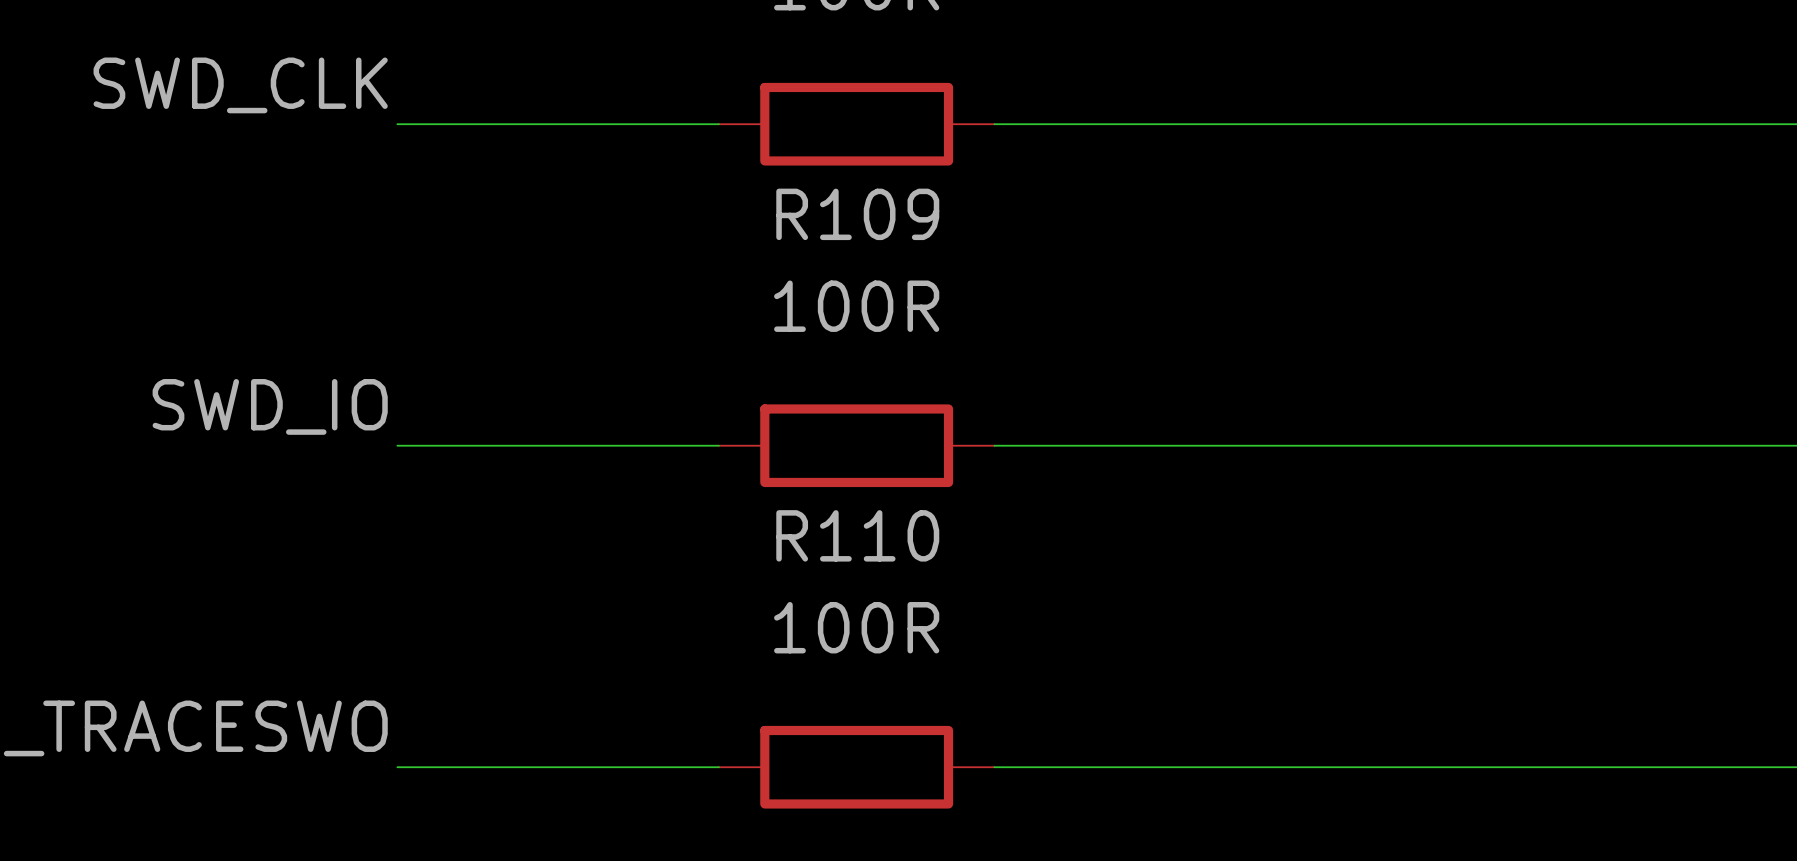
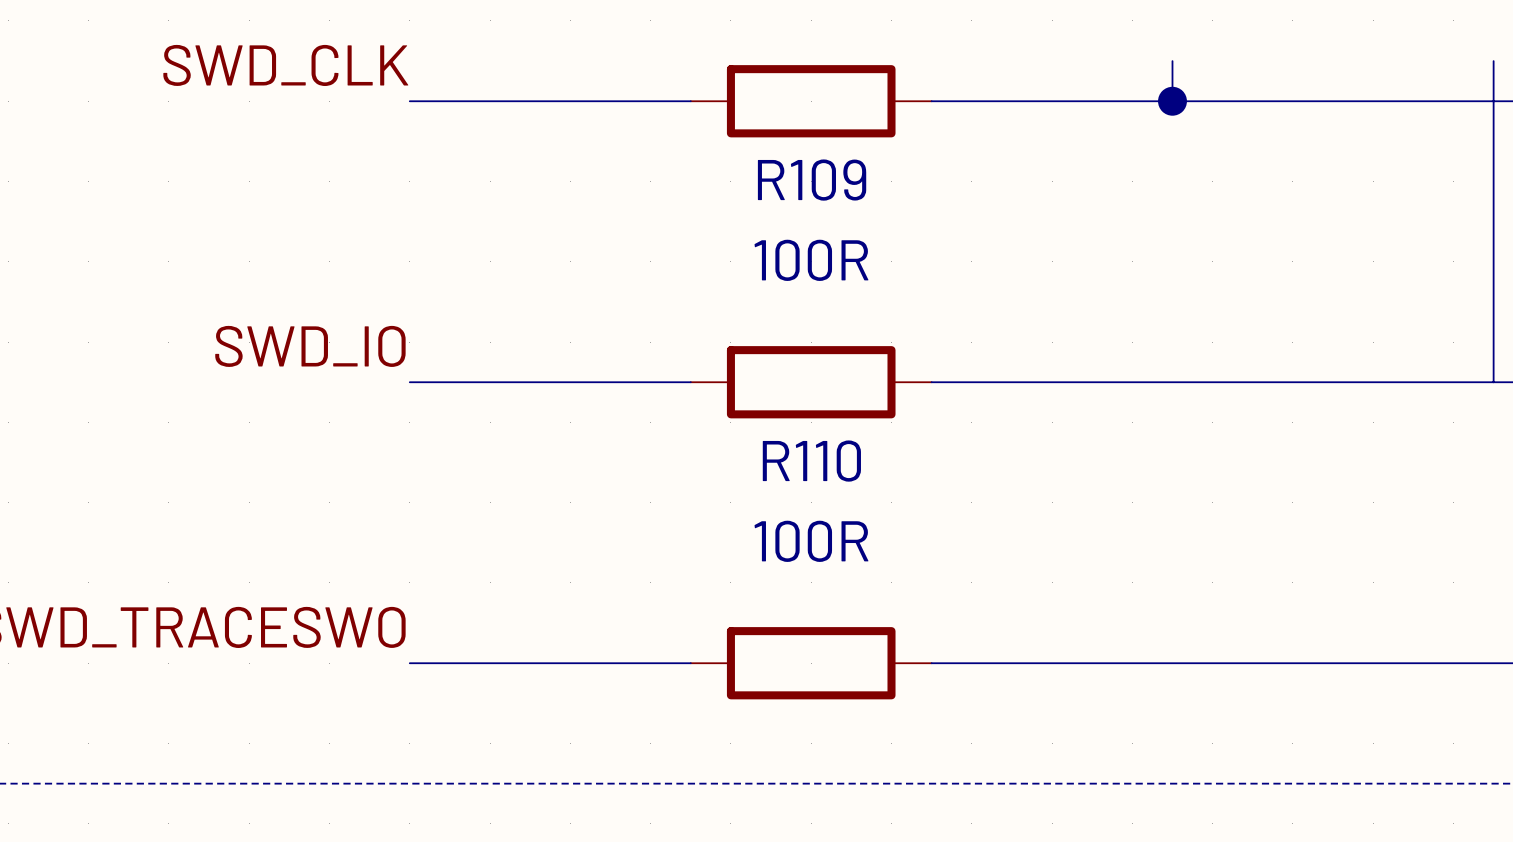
wire: none -> (1172, 61) (1172, 101)
wire: none -> (1493, 61) (1493, 382)
junction: none -> (1172, 101)

